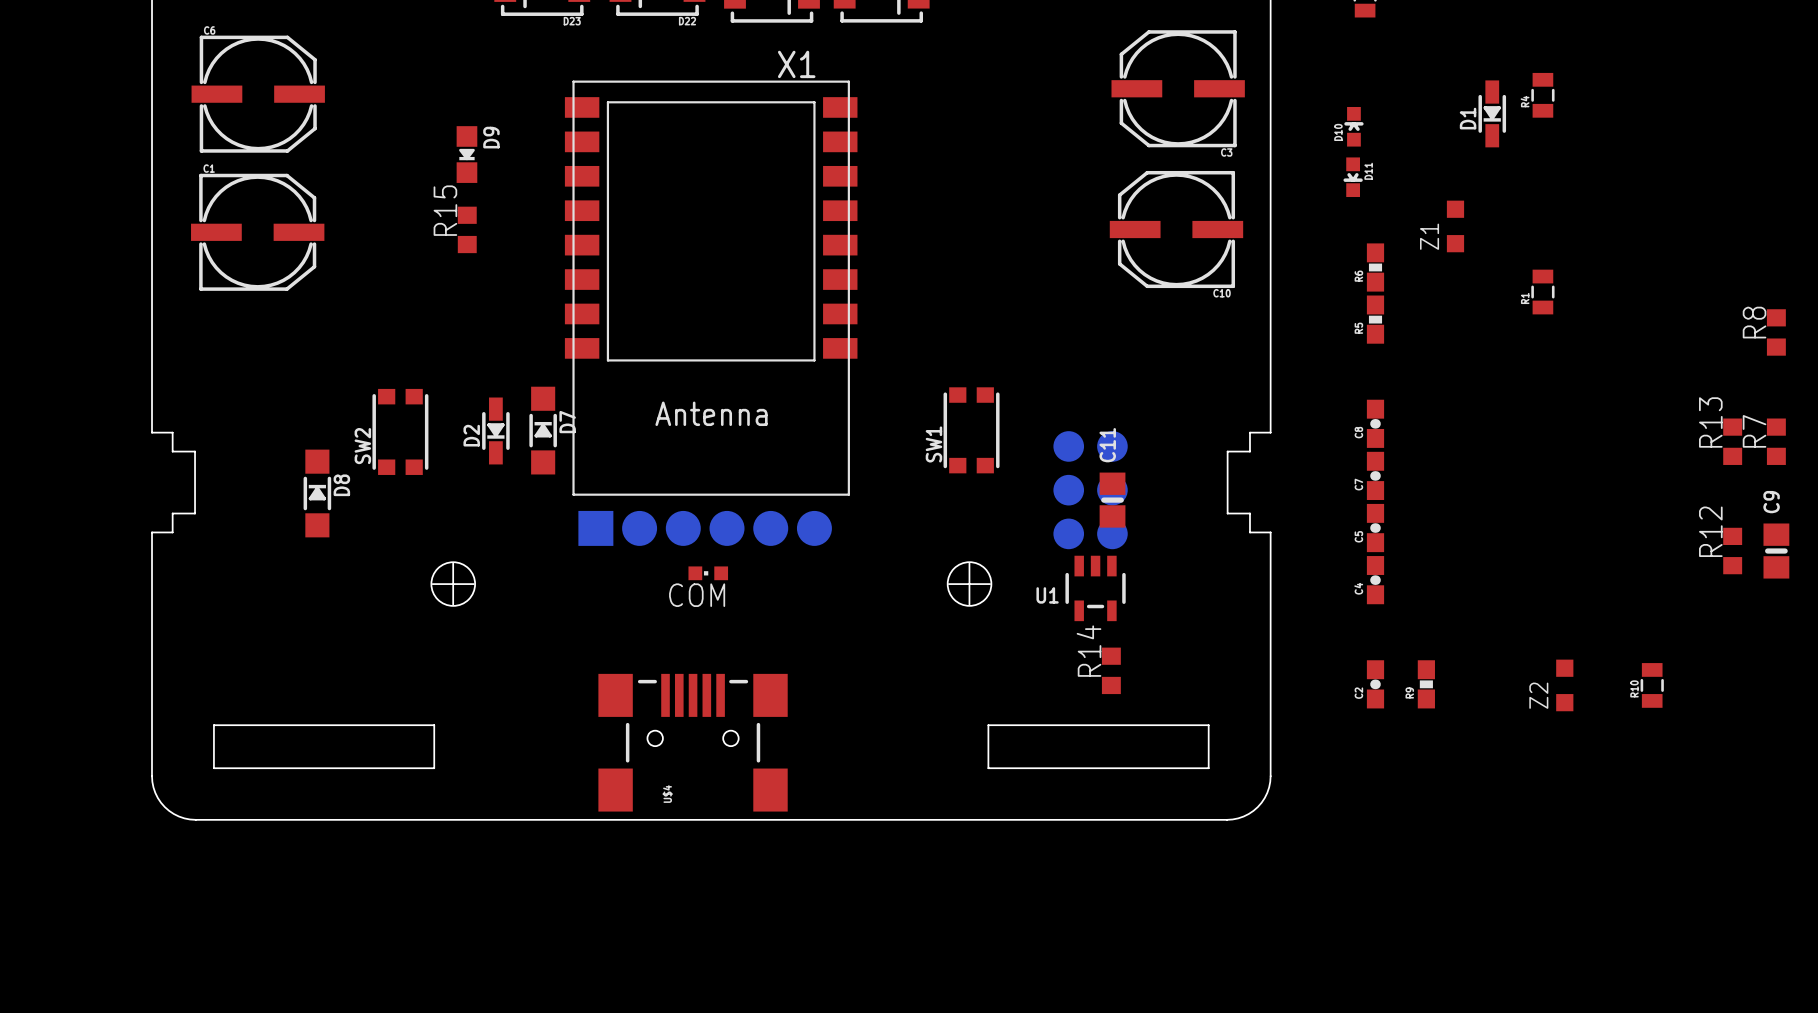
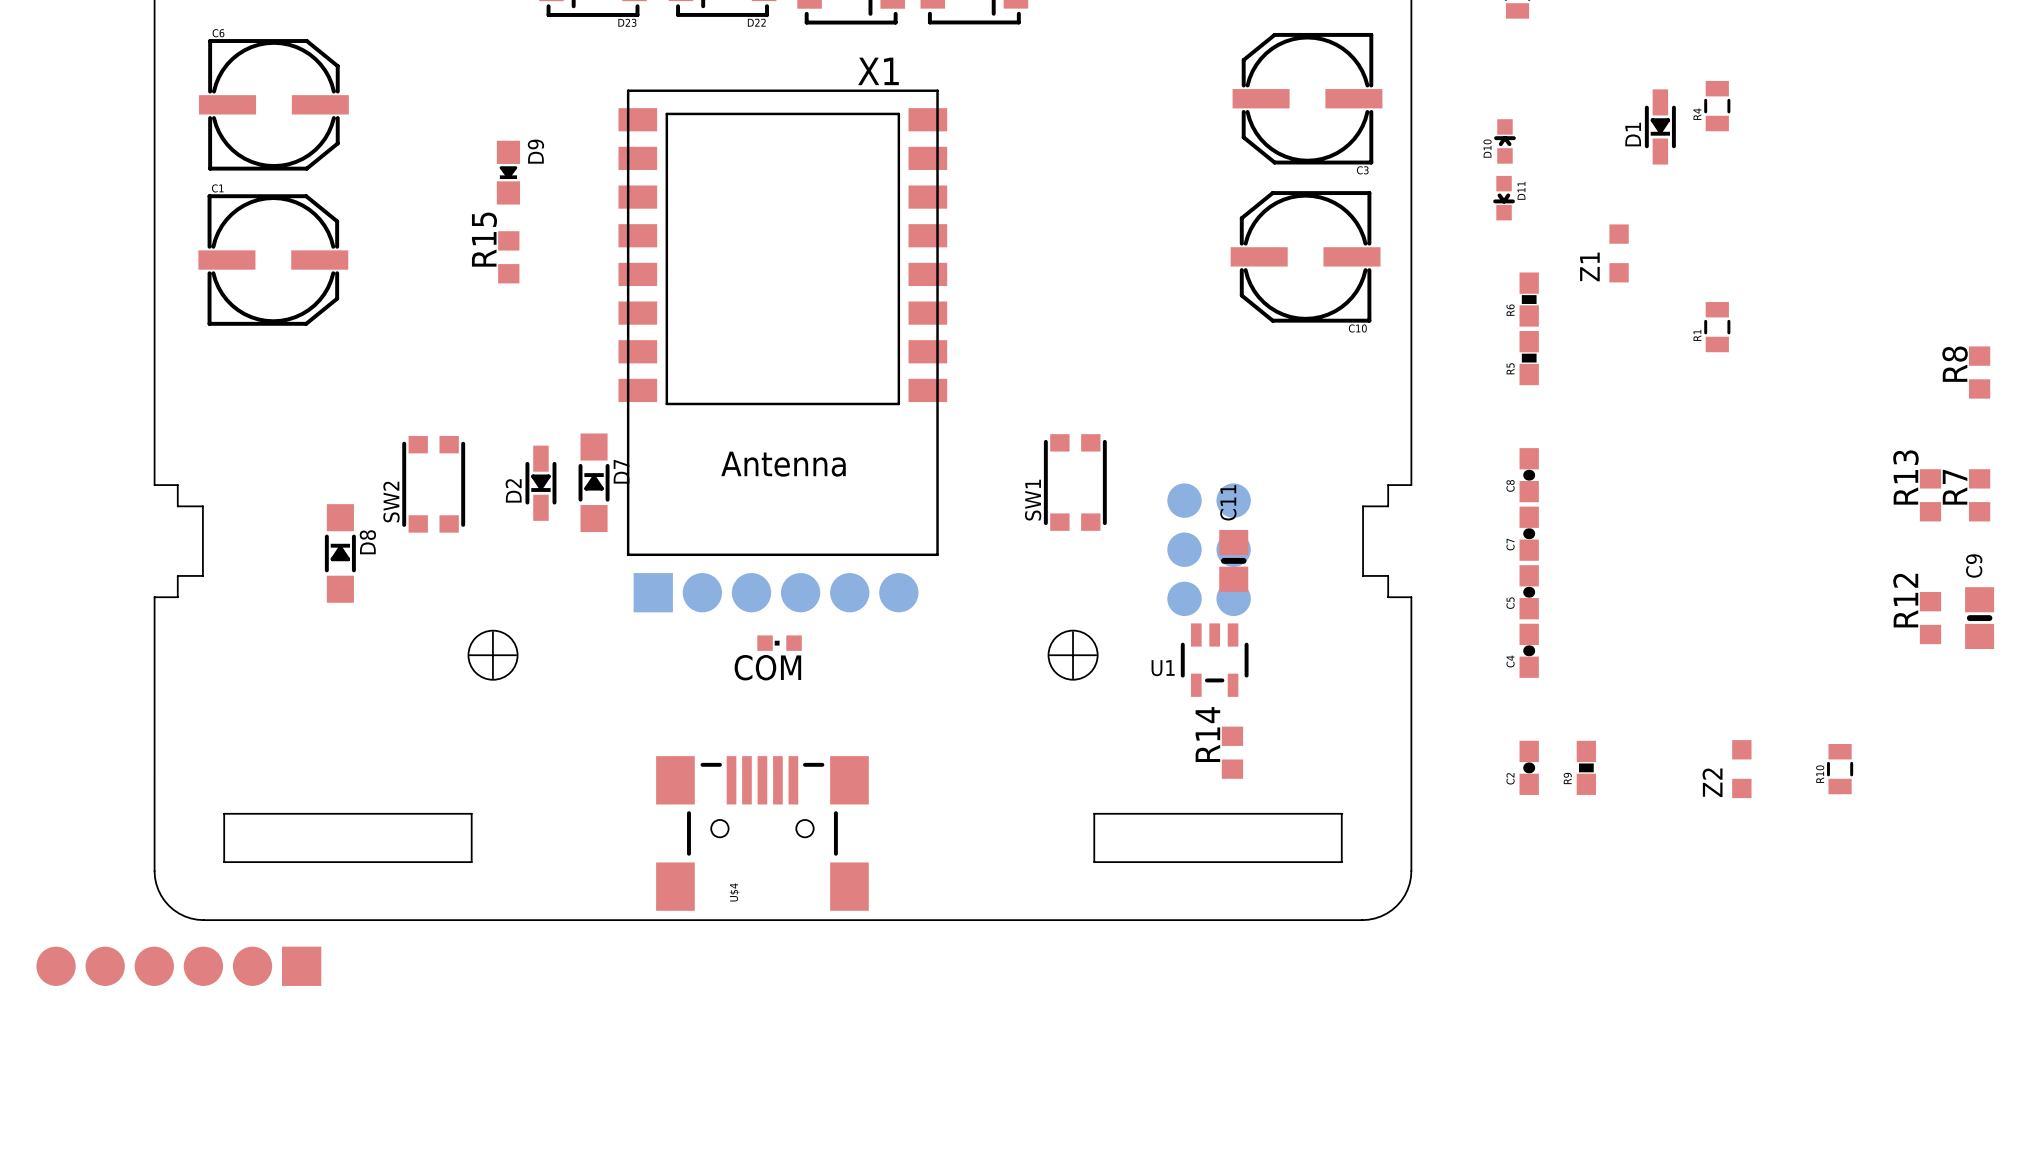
part: none -> (178, 966)

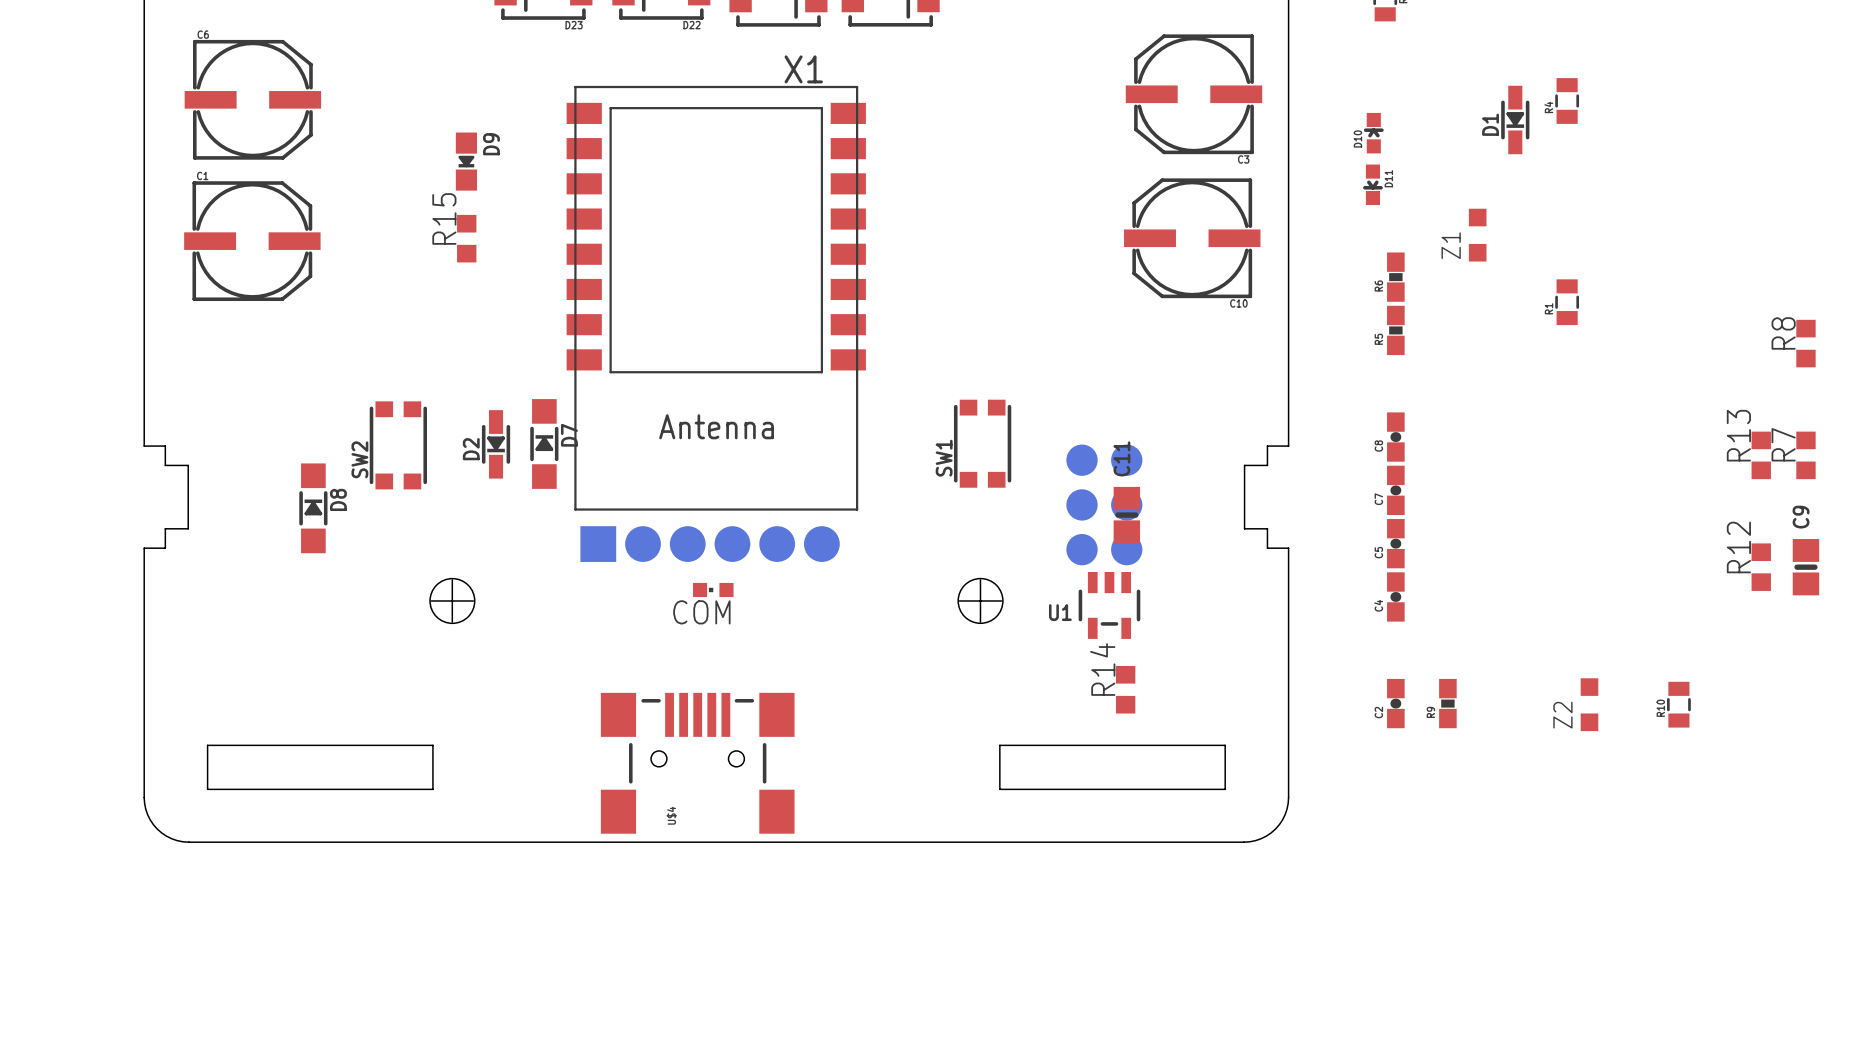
part: (178, 966) -> none

